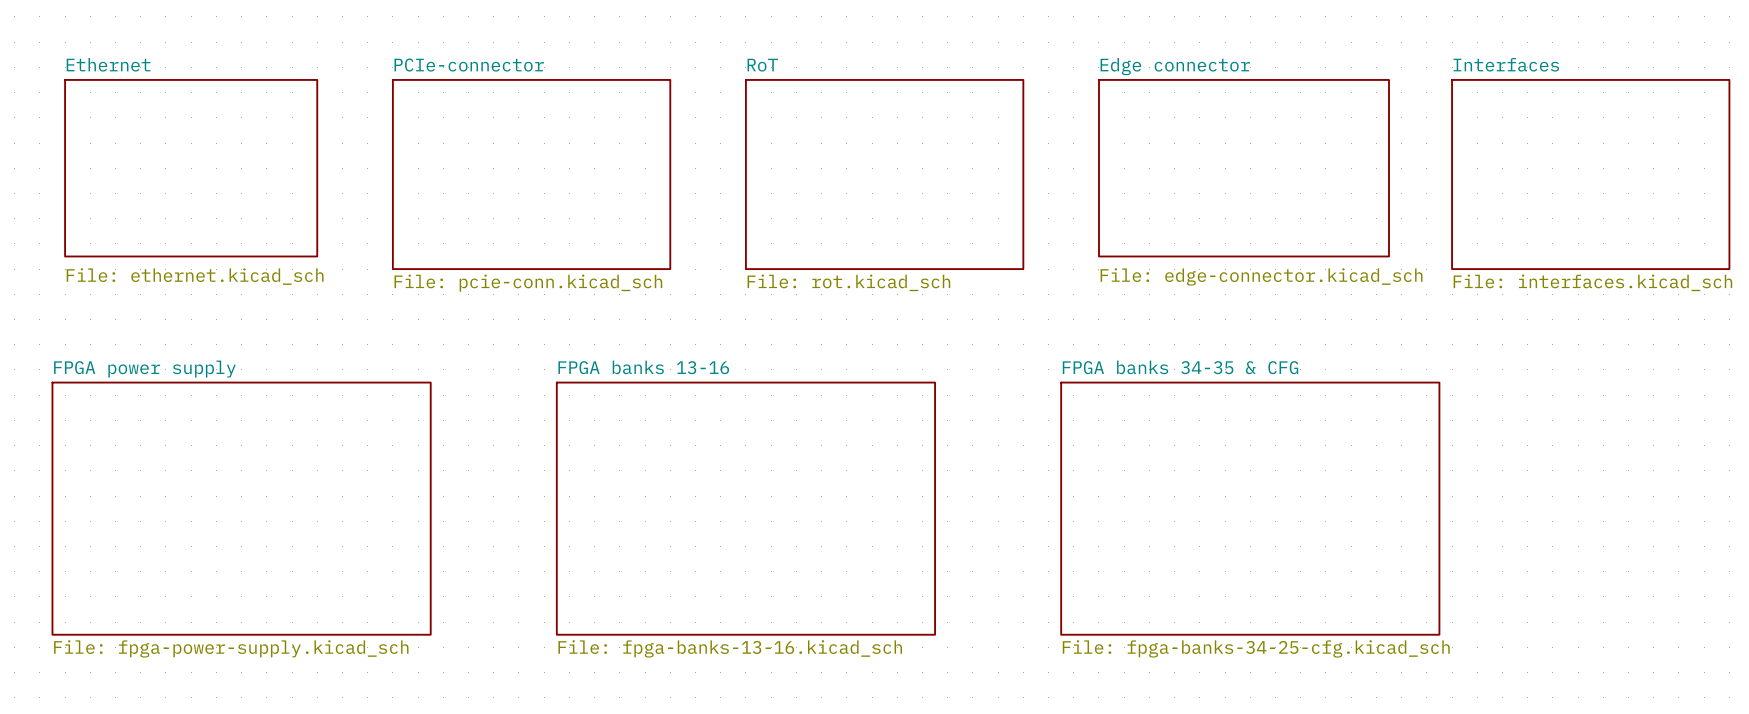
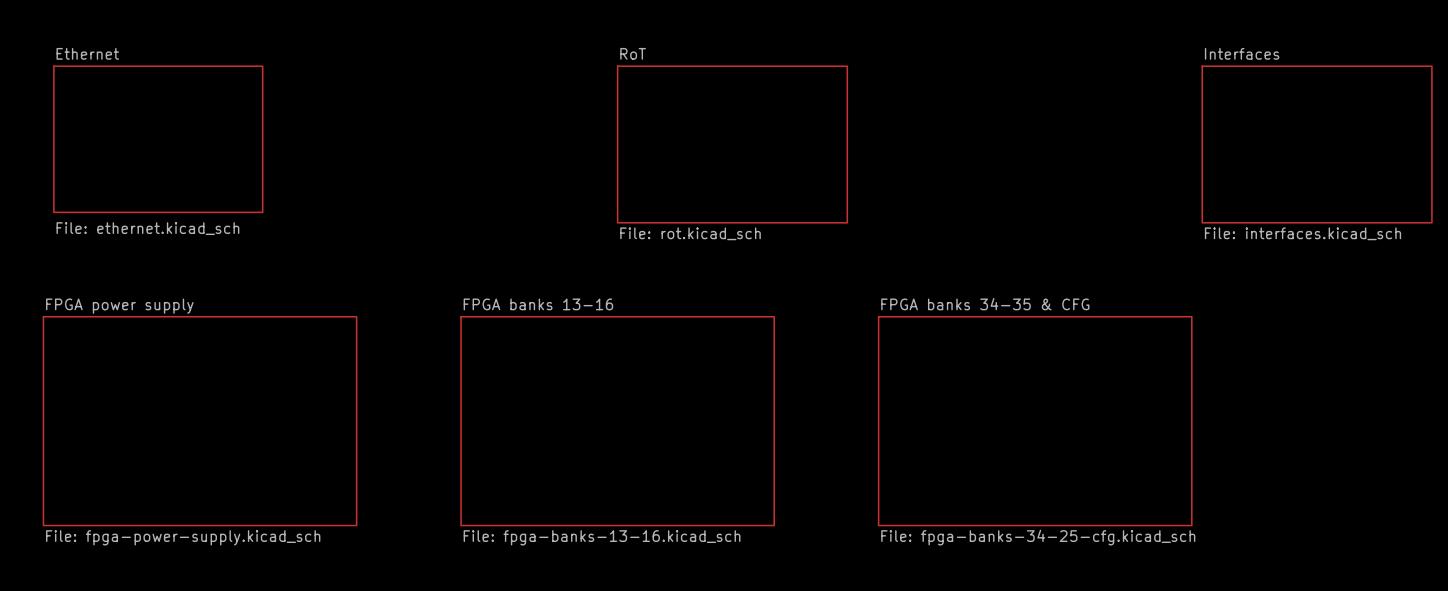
sheet Edge connector: File: edge-connector.kicad_sch (1243, 168) -> none
sheet PCIe-connector: File: pcie-conn.kicad_sch (531, 174) -> none

